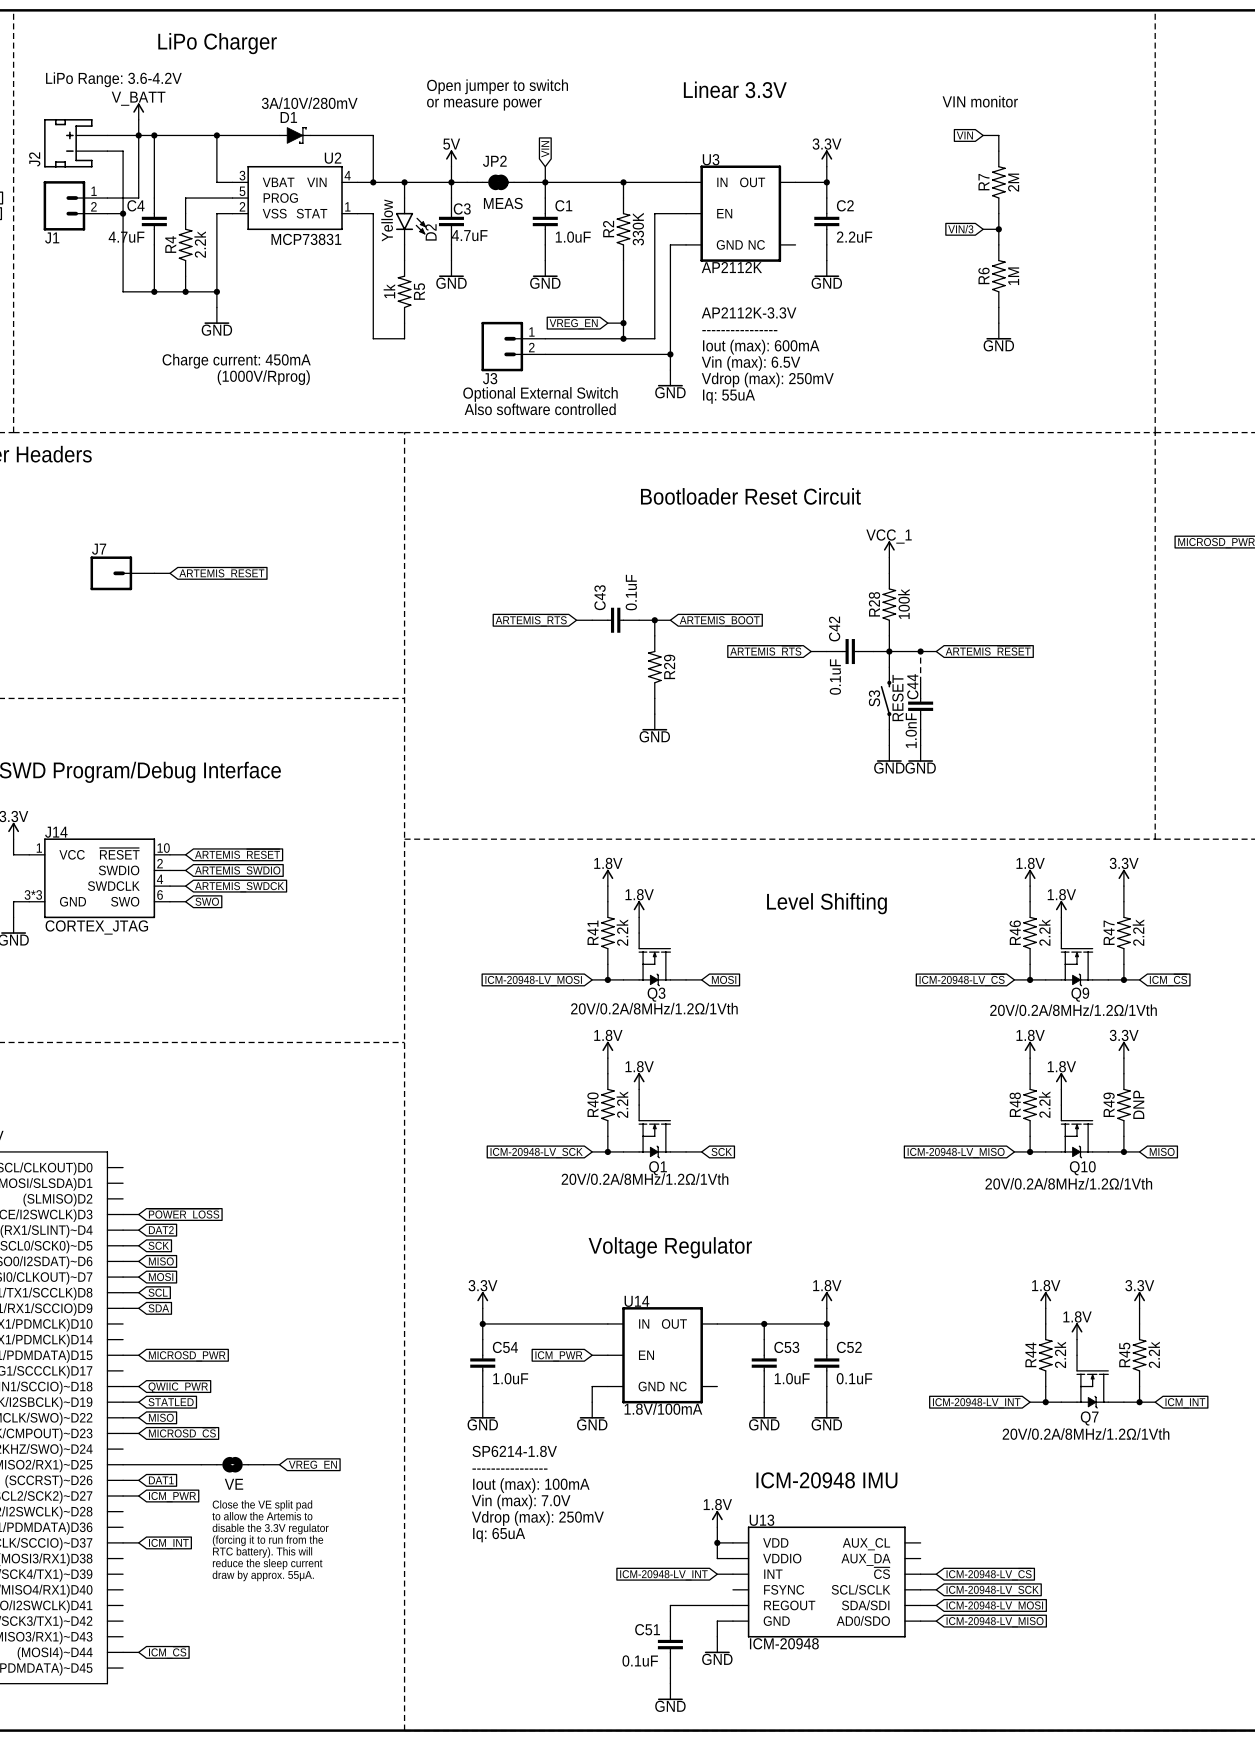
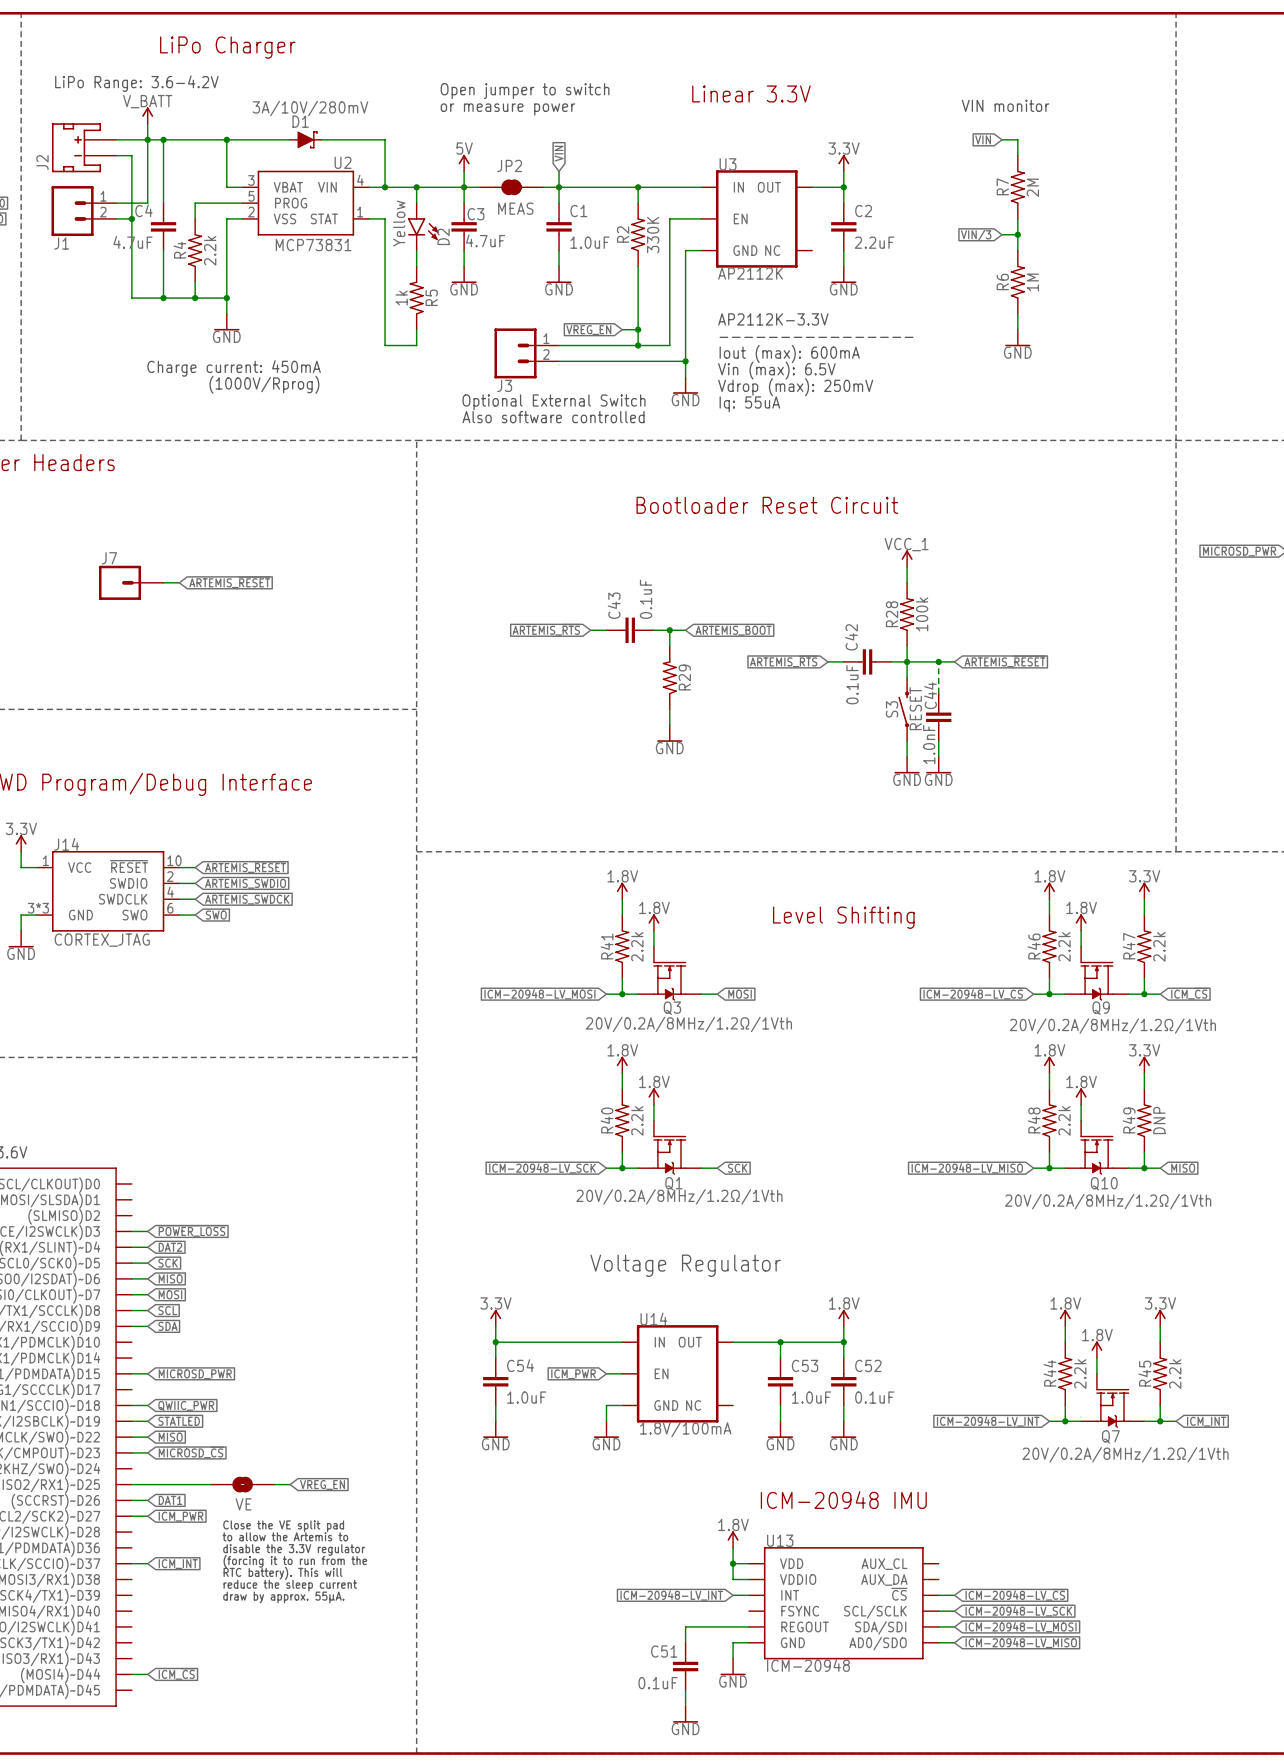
text: SP6214-1.8V (514, 1451) -> none
text: ---------------- (509, 1469) -> none
text: Iout (max): 100mA (531, 1485) -> none
text: Vin (max): 7.0V (521, 1502) -> none
text: Vdrop (max): 250mV (537, 1518) -> none
text: Iq: 65uA (499, 1535) -> none

